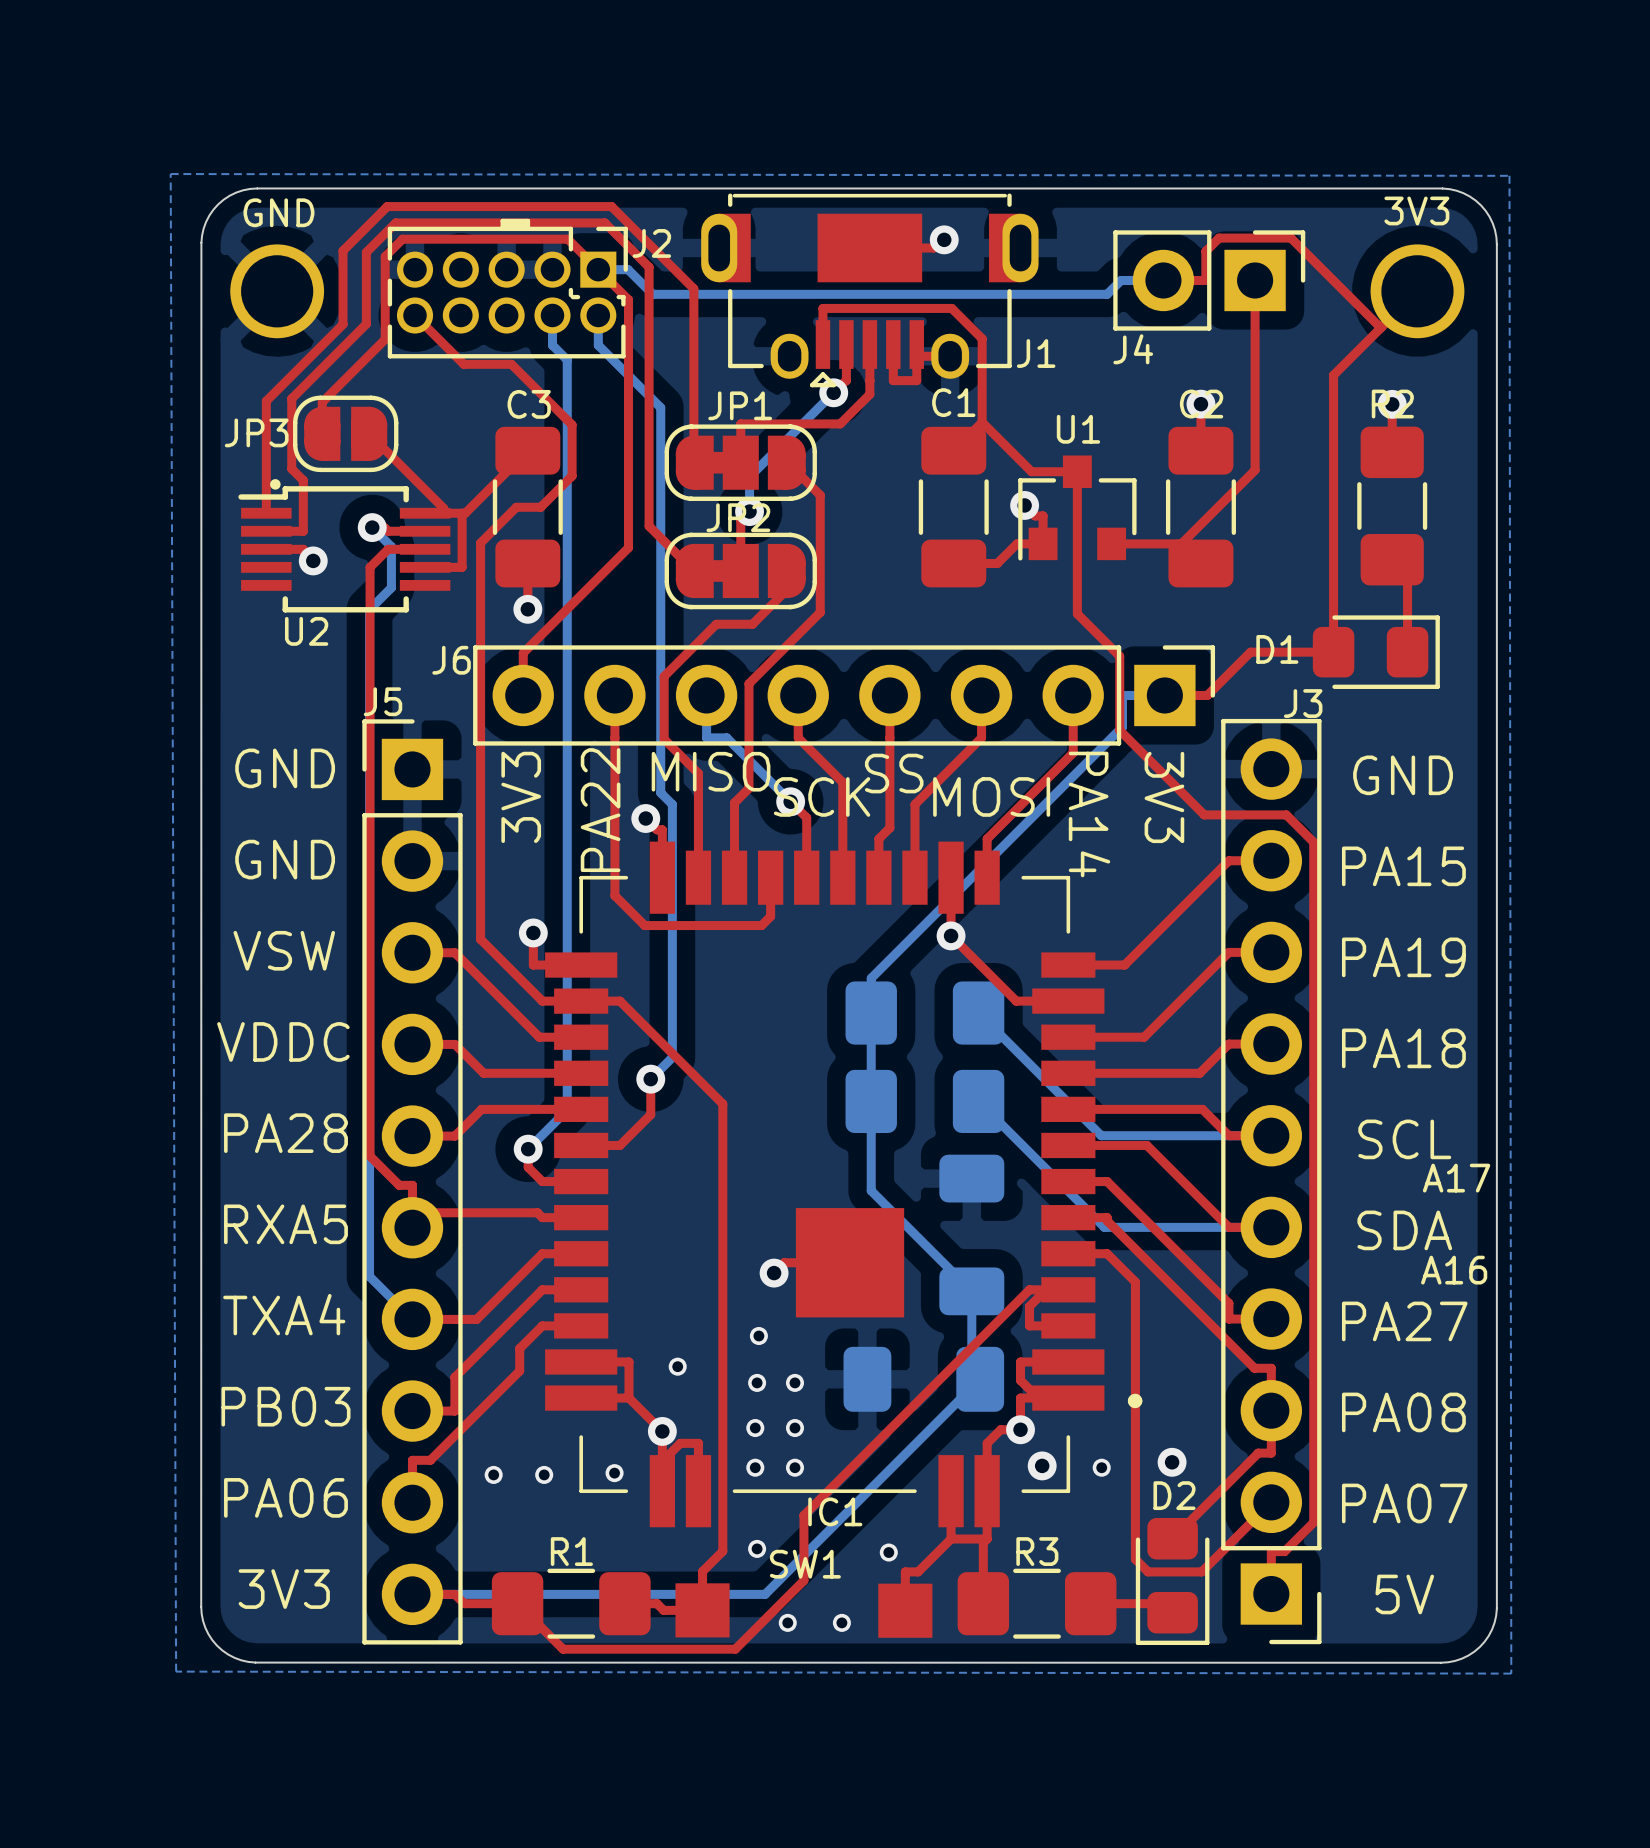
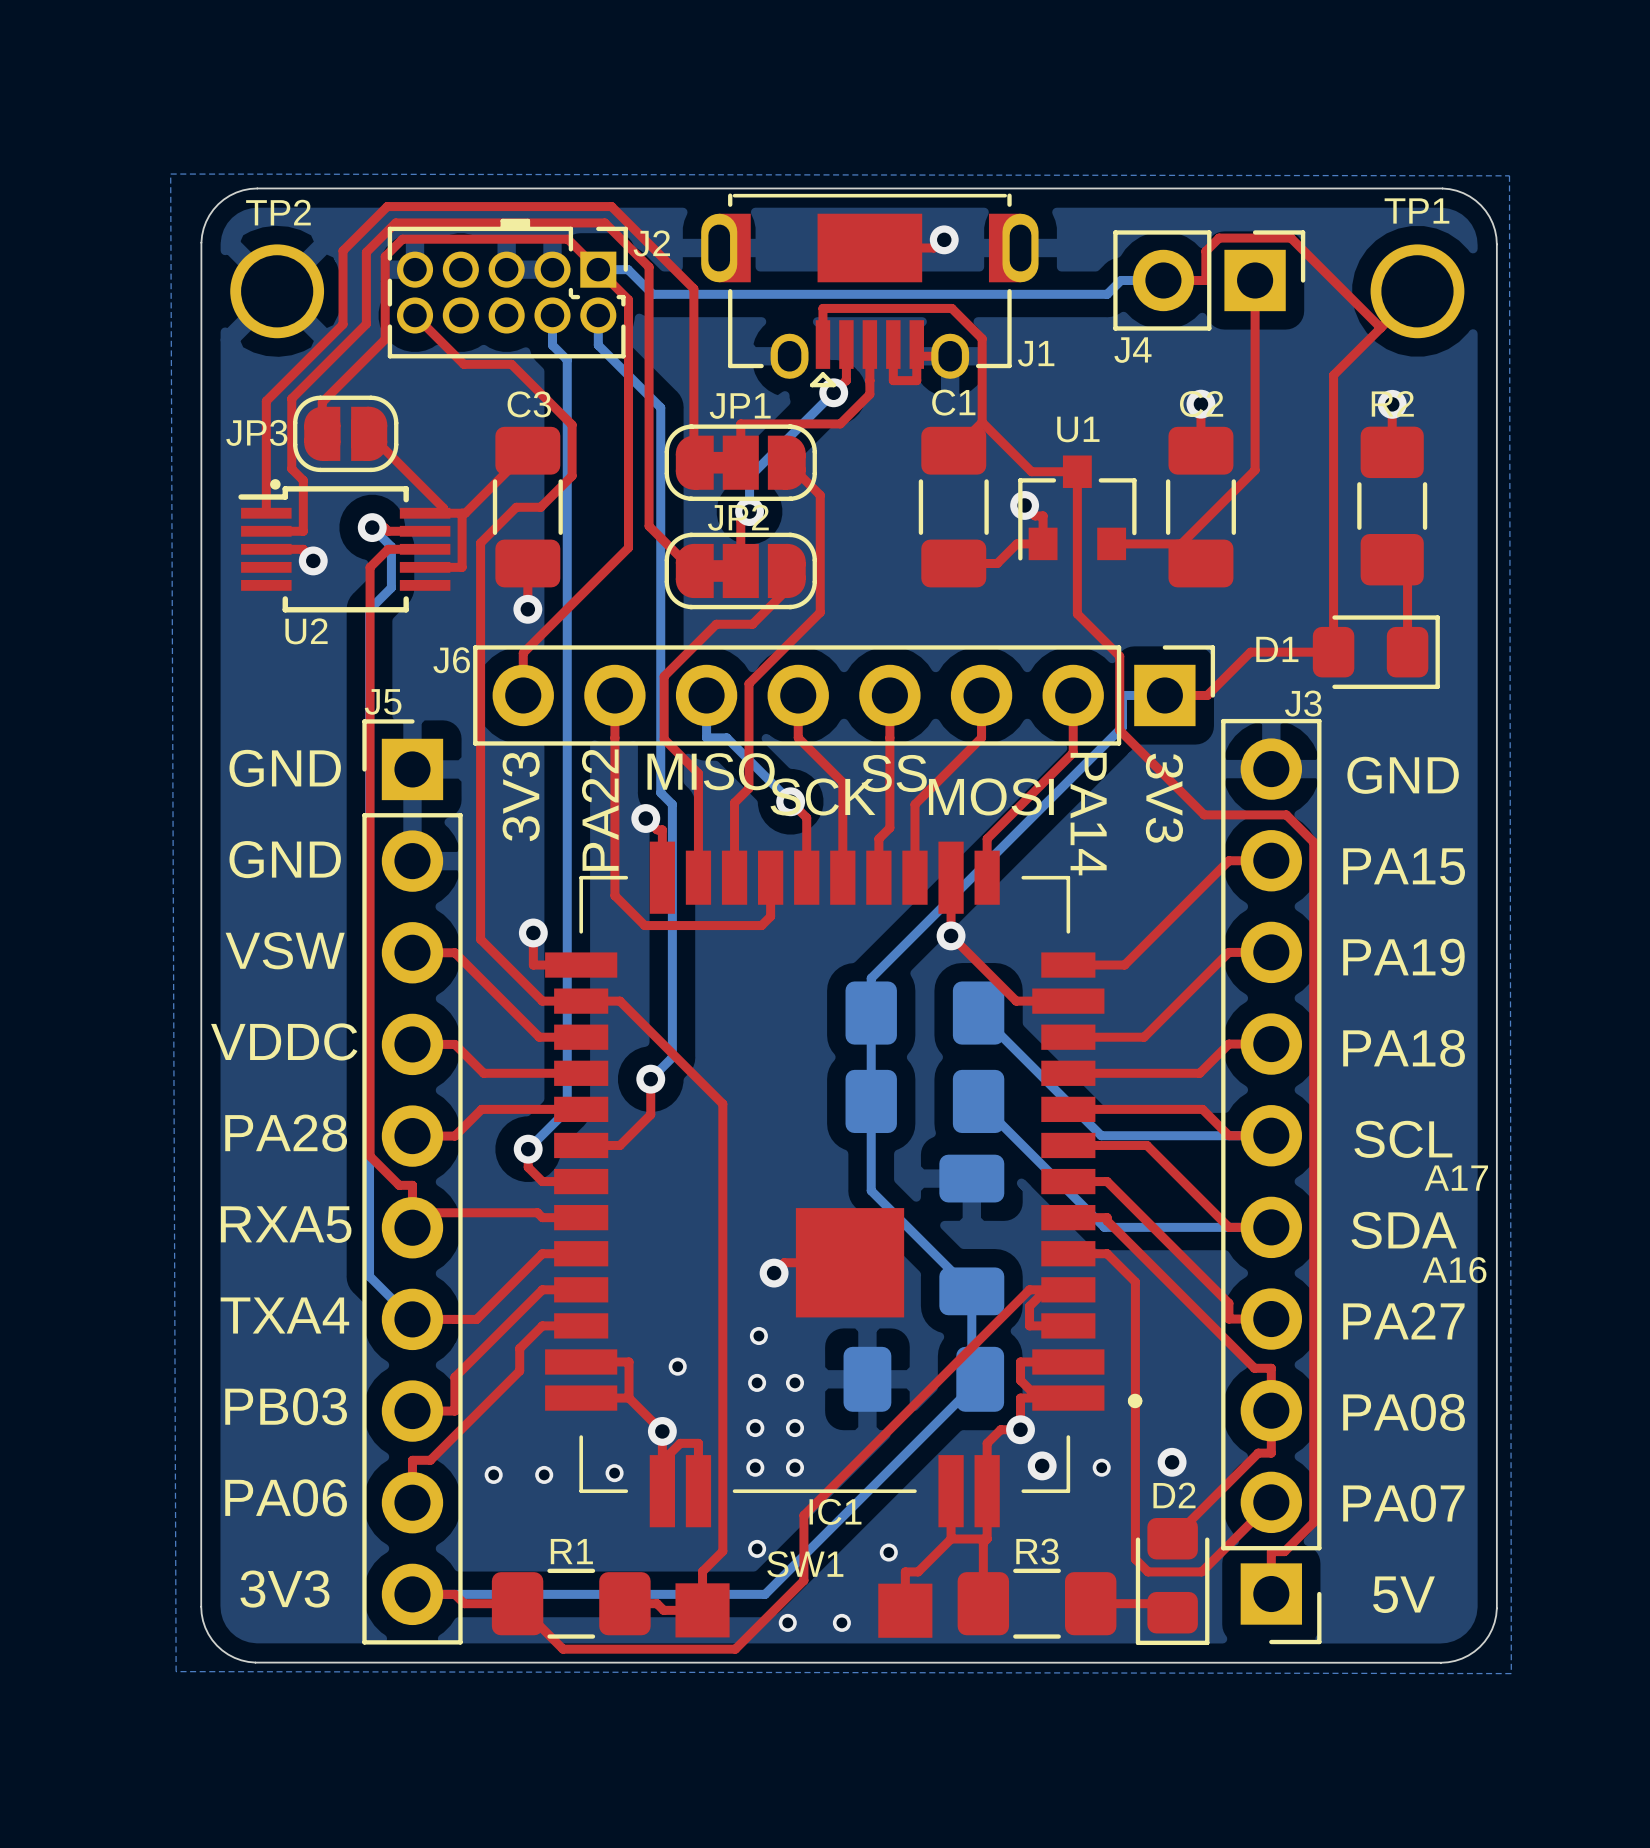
3V3 name: 3V3 (1416, 210) -> TP1 (1416, 210)
GND name: GND (278, 212) -> TP2 (278, 212)

